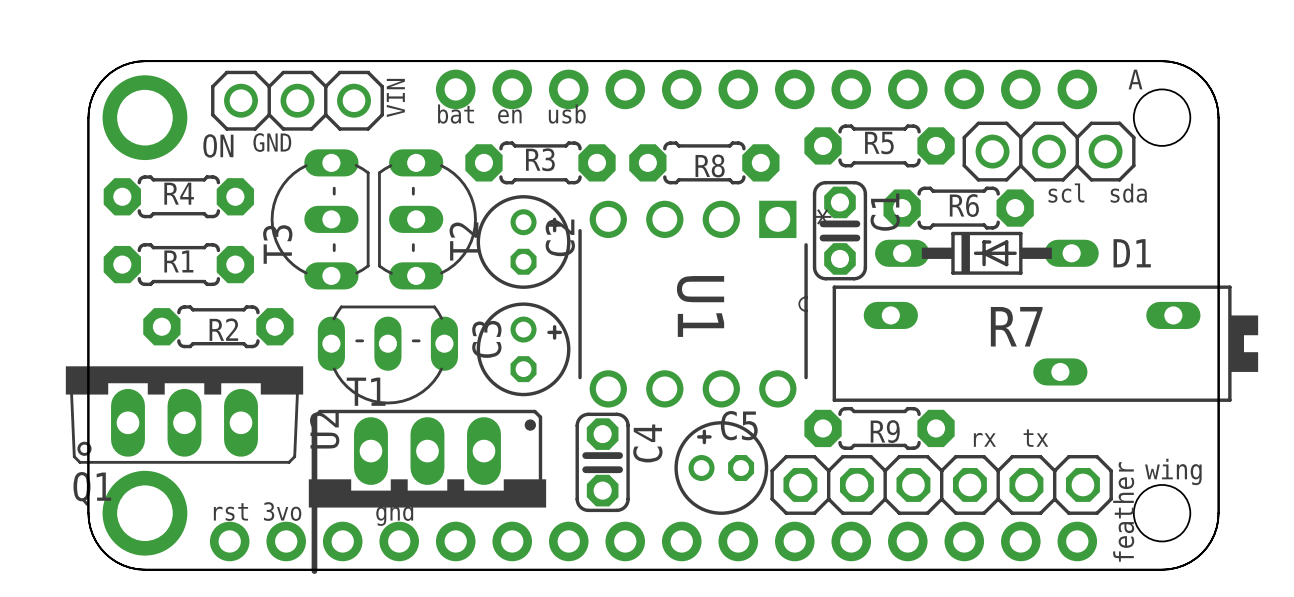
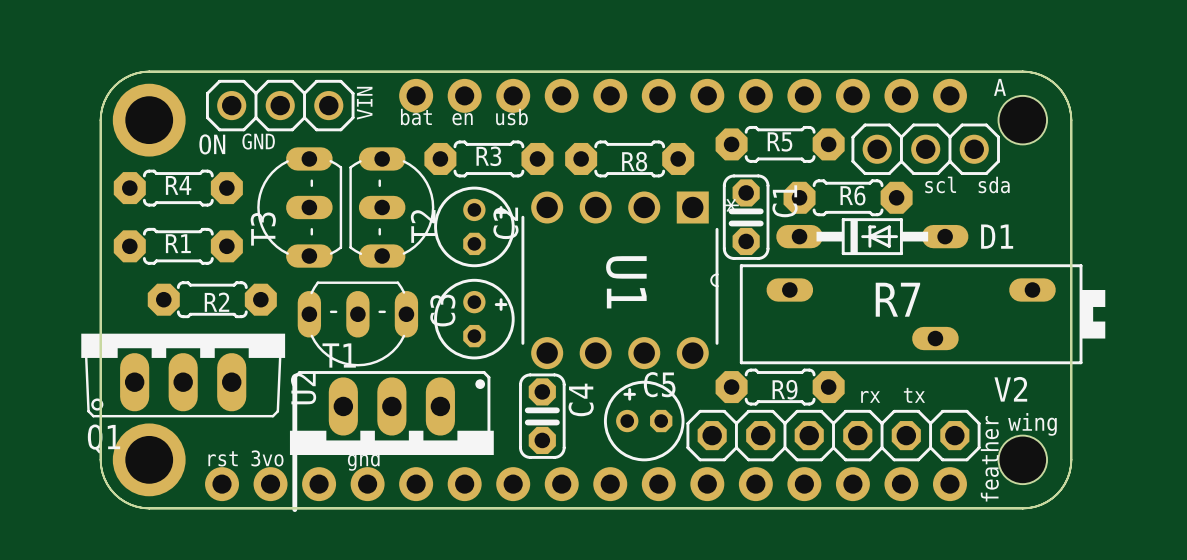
text: none -> V2 (1010, 389)

